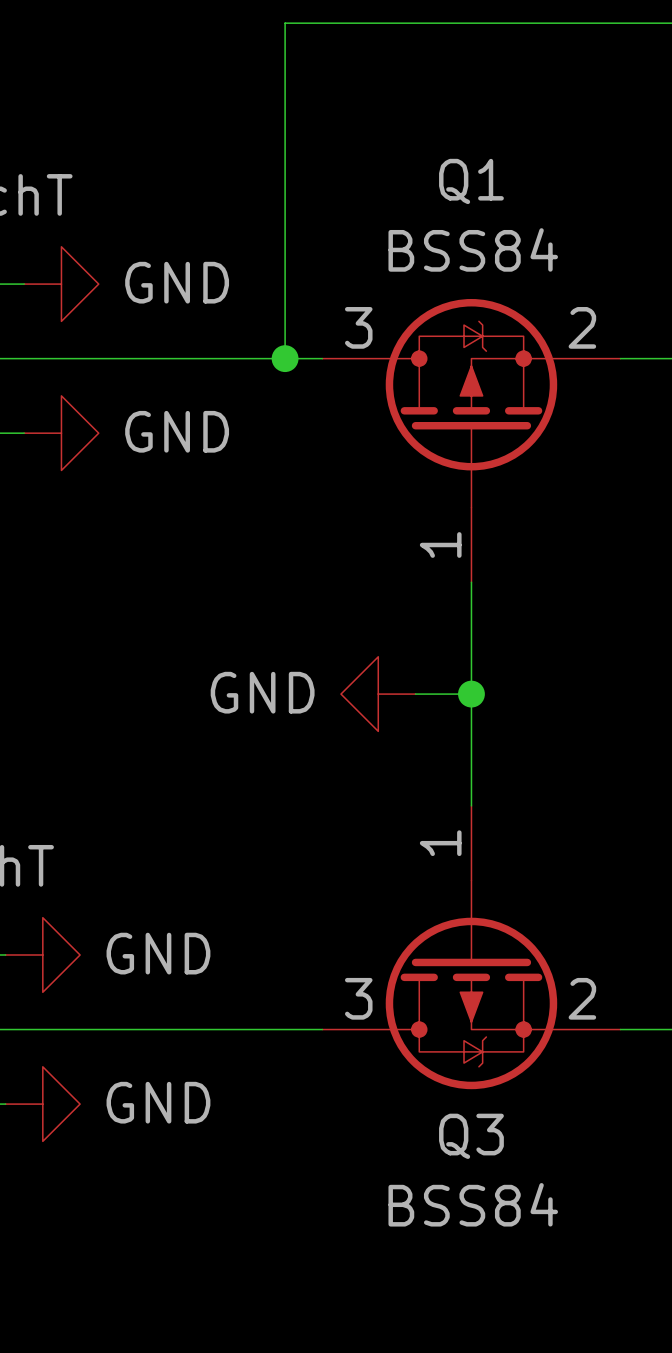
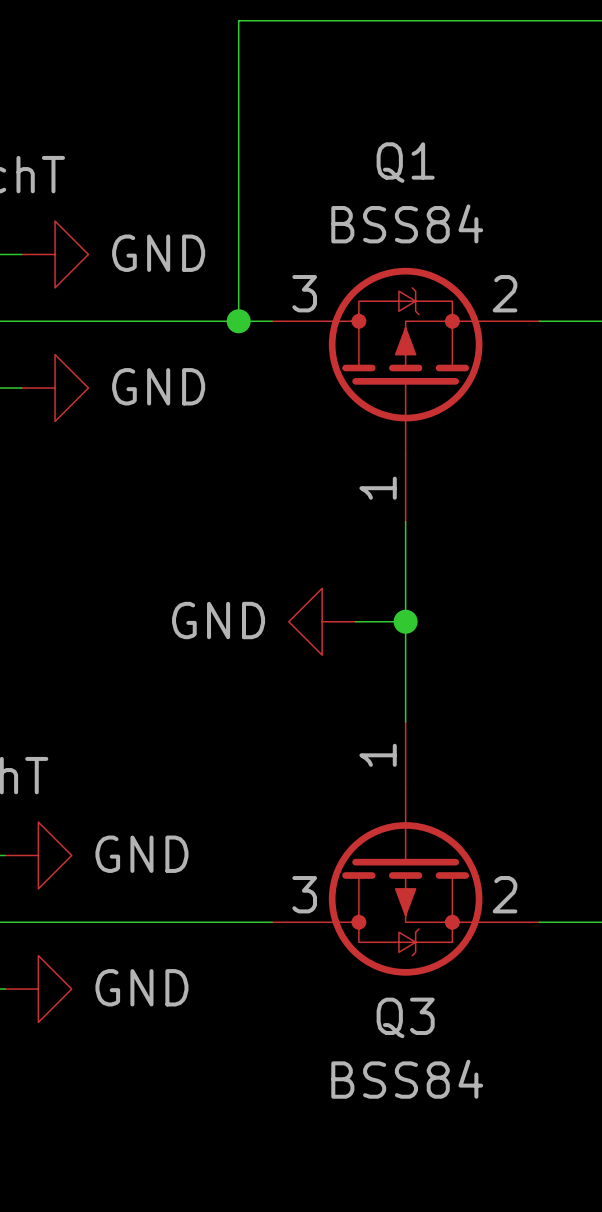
wire: (285, 23) (285, 358) -> (255, 20) (238, 20) (238, 321)
junction position: (285, 358) -> (238, 321)
Q1 position: (471, 440) -> (405, 394)
wire: (471, 582) (471, 805) -> (405, 521) (405, 721)
power symbol position: GND (378, 694) -> GND (322, 621)
junction position: (471, 694) -> (405, 621)
Q3 position: (471, 947) -> (405, 848)

